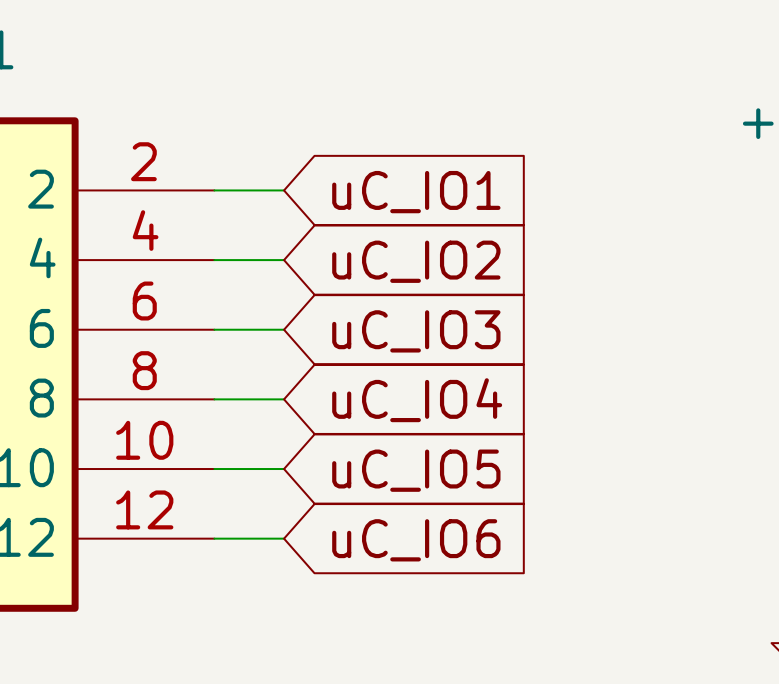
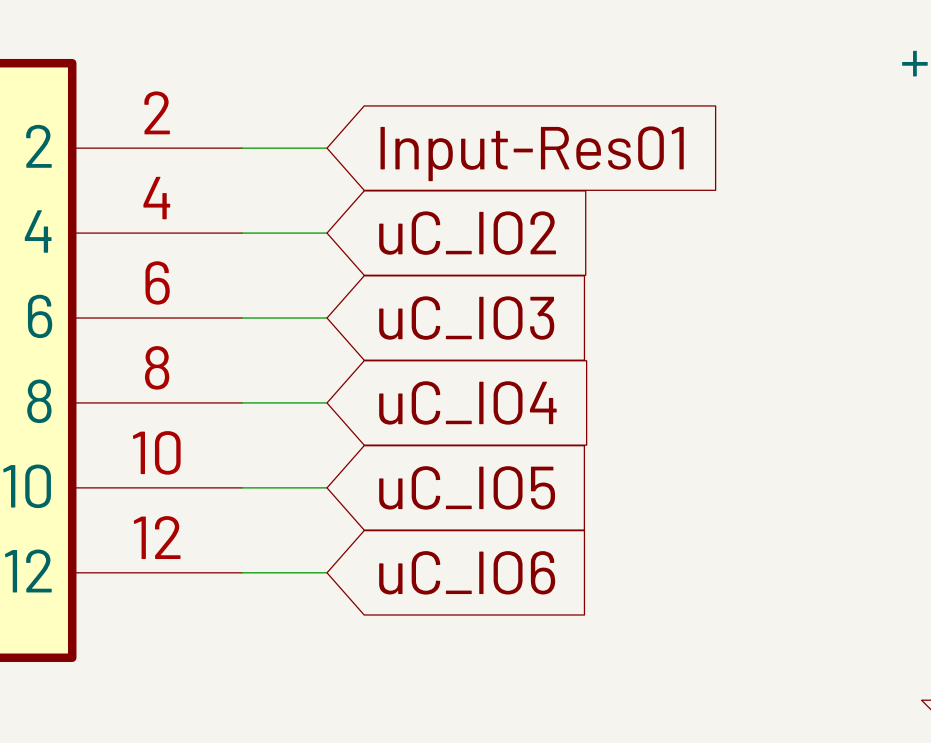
global label: uC_IO1 (416, 192) -> Input-Res01 (532, 153)

